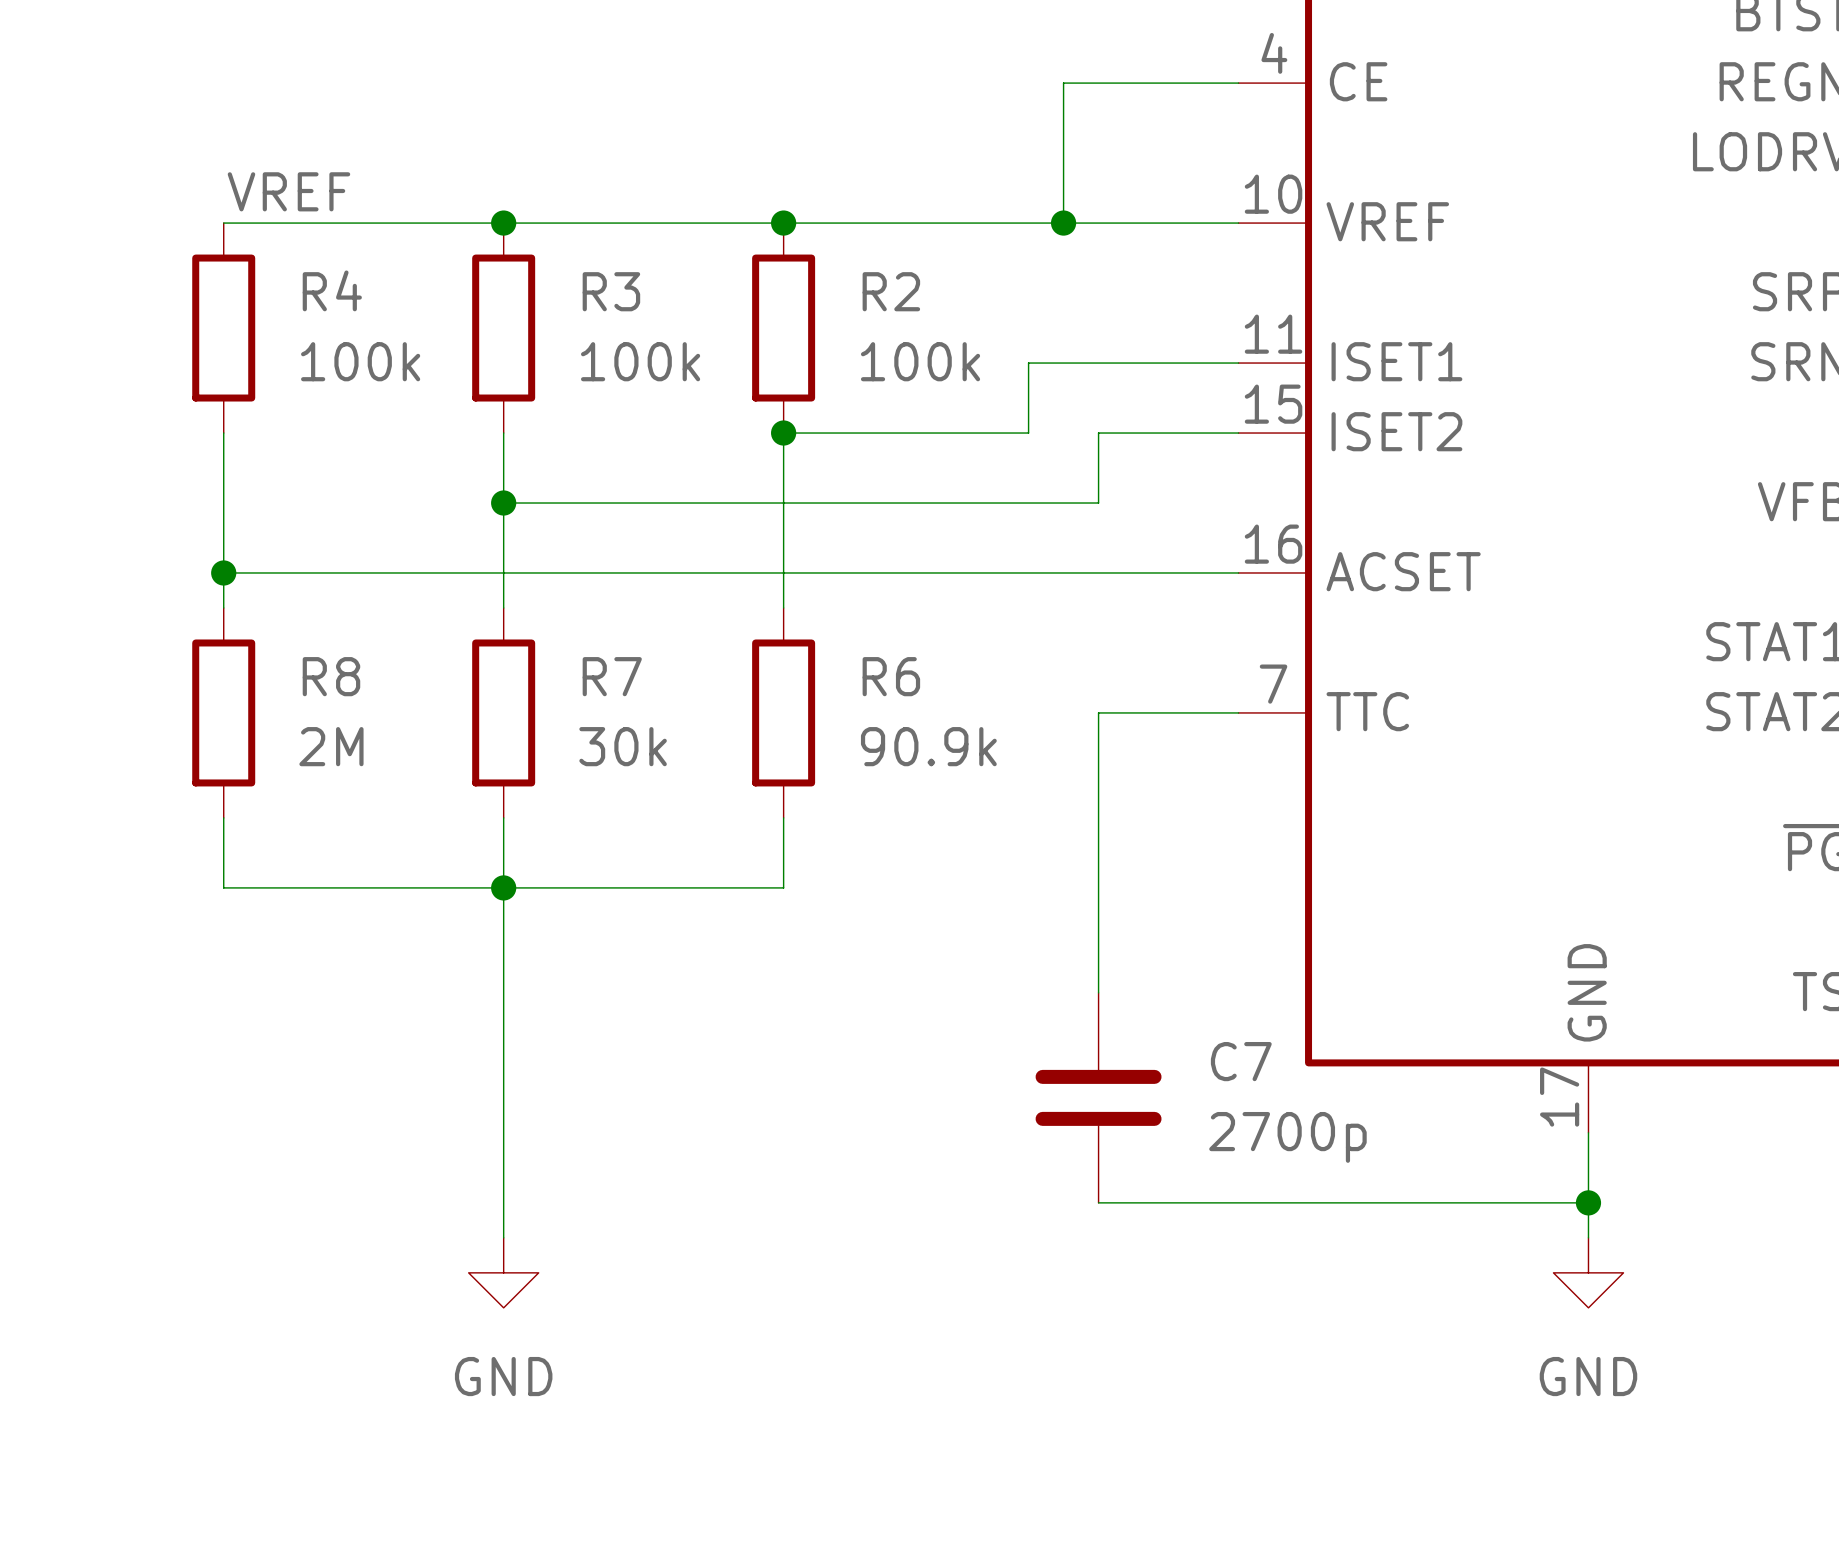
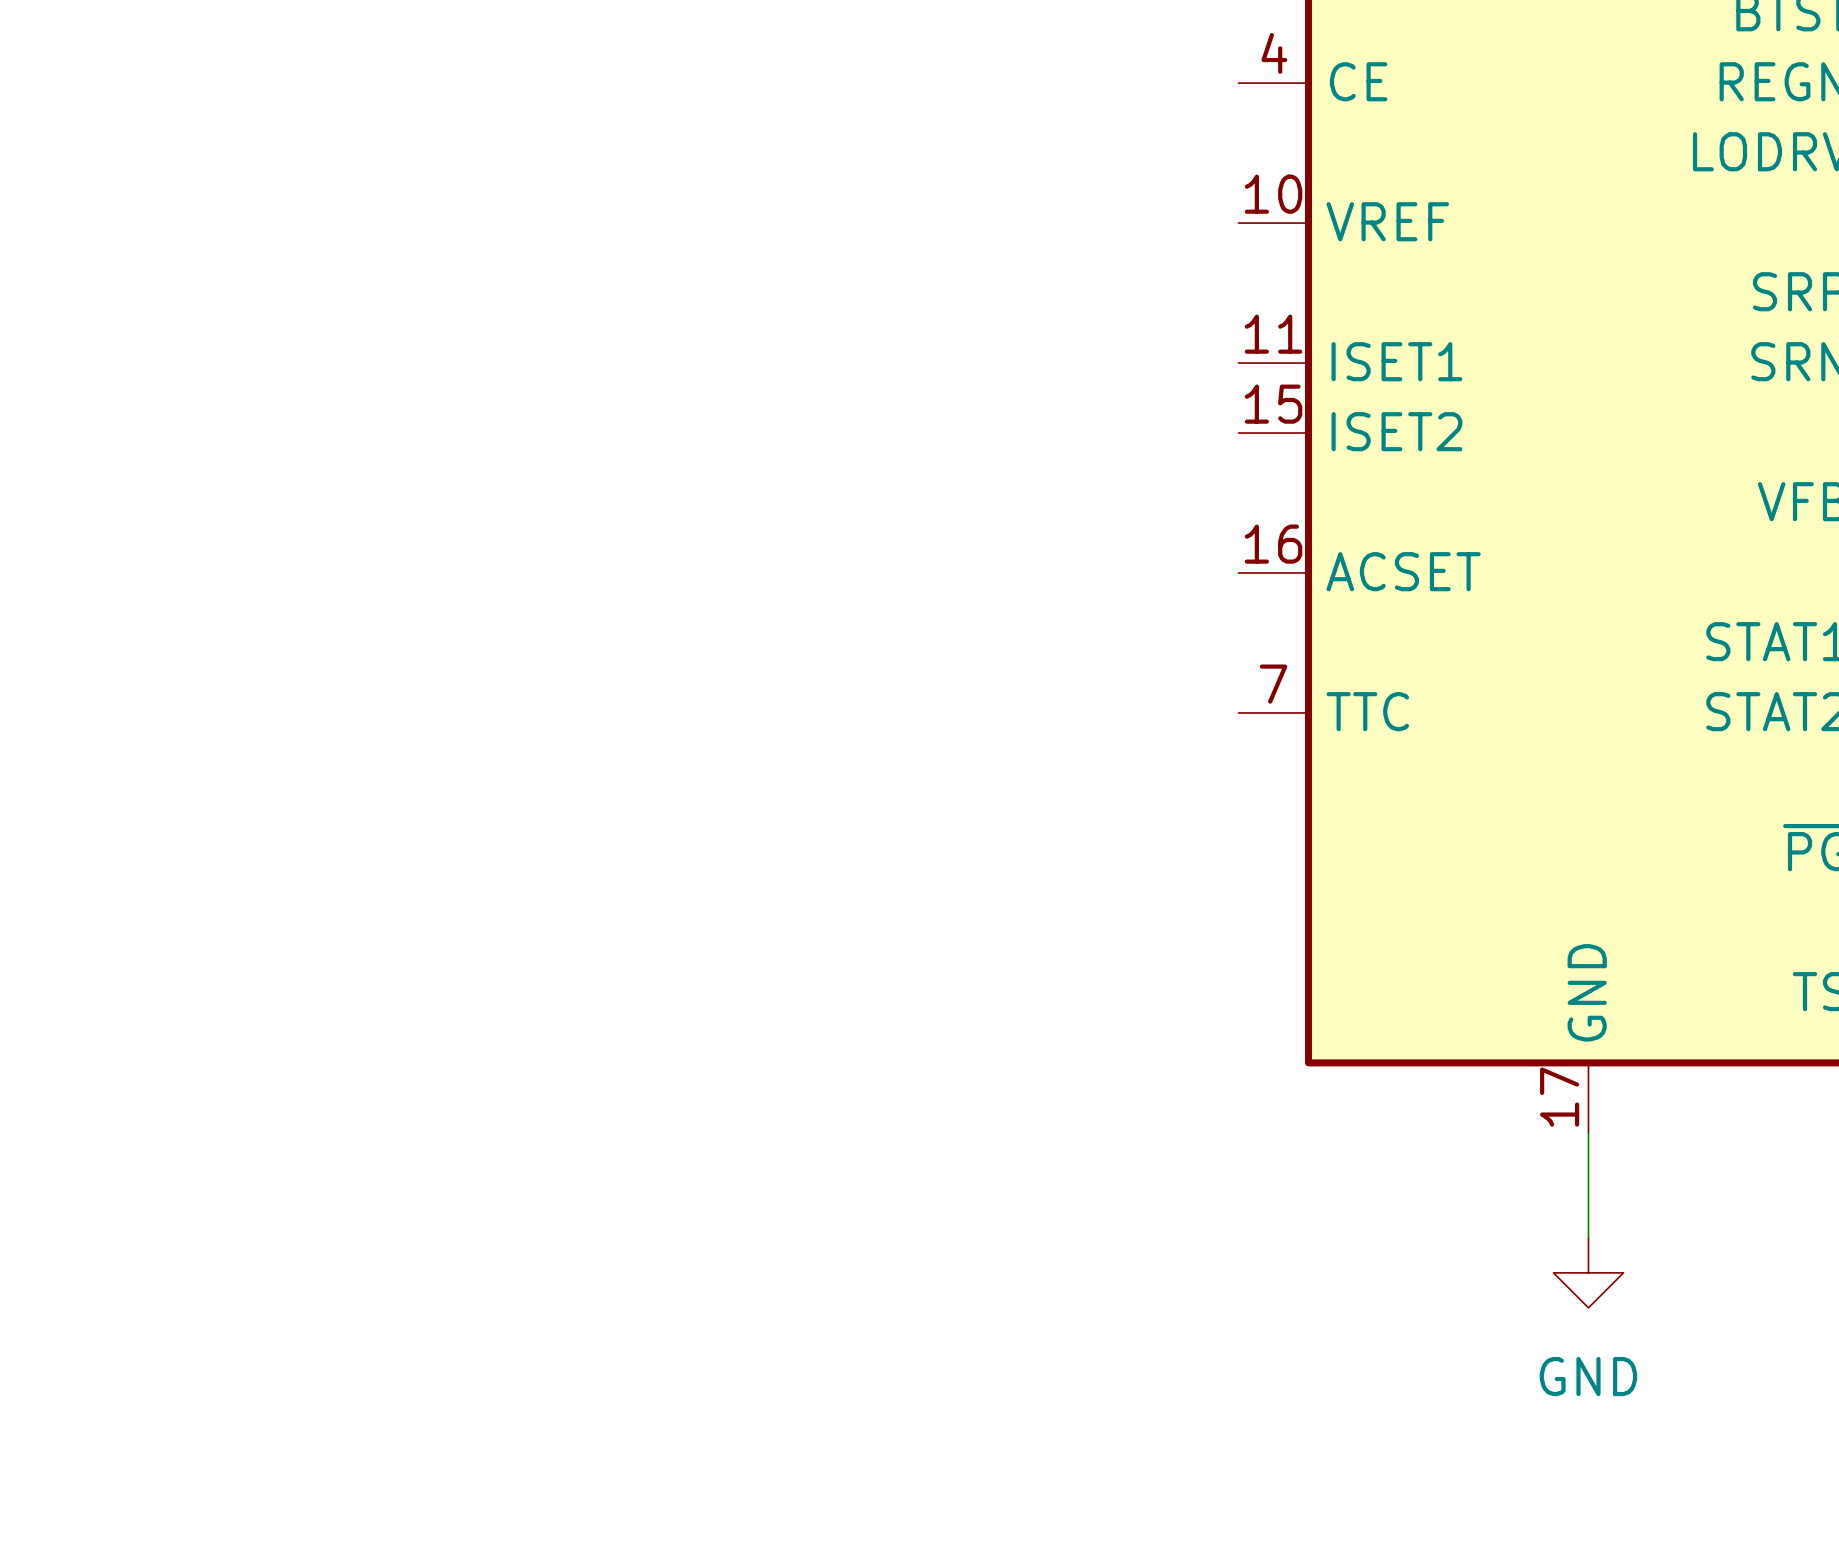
wire: (1238, 83) (1063, 83) (1063, 223) -> none
label: VREF (288, 191) -> none
wire: (223, 223) (1238, 223) -> none
junction: (503, 223) -> none
junction: (783, 223) -> none
junction: (1063, 223) -> none
R4: 100k (223, 328) -> none
R3: 100k (503, 328) -> none
R2: 100k (783, 328) -> none
wire: (1238, 363) (1028, 363) (1028, 433) (783, 433) (783, 607) -> none
wire: (223, 433) (223, 607) -> none
wire: (503, 433) (503, 607) -> none
junction: (783, 433) -> none
wire: (1238, 433) (1098, 433) (1098, 503) (503, 503) -> none
junction: (503, 503) -> none
wire: (223, 572) (1238, 572) -> none
junction: (223, 572) -> none
R8: 2M (223, 712) -> none
R7: 30k (503, 712) -> none
R6: 90.9k (783, 712) -> none
wire: (1238, 712) (1098, 712) (1098, 992) -> none
wire: (223, 817) (223, 887) (783, 887) (783, 817) -> none
wire: (503, 817) (503, 1237) -> none
junction: (503, 887) -> none
C7: 2700p (1098, 1097) -> none
wire: (1098, 1202) (1588, 1202) -> none
junction: (1588, 1202) -> none
power symbol: GND (503, 1272) -> none

